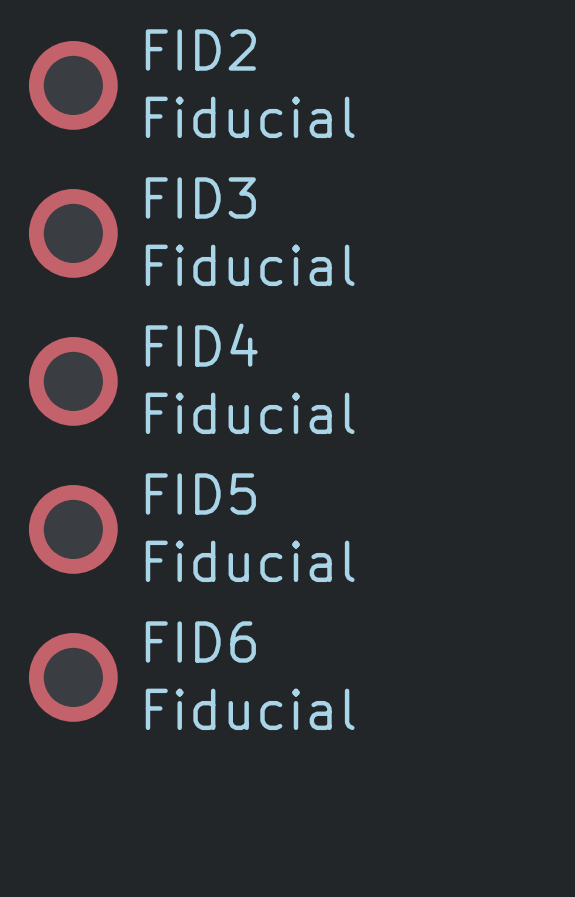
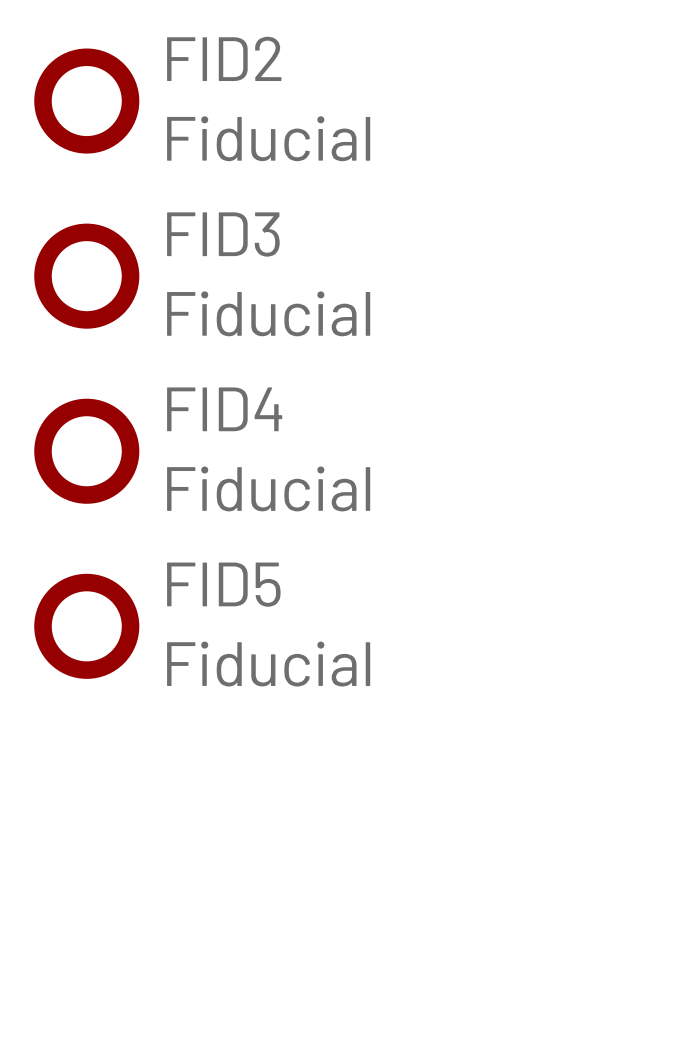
FID6: Fiducial (73, 677) -> none

